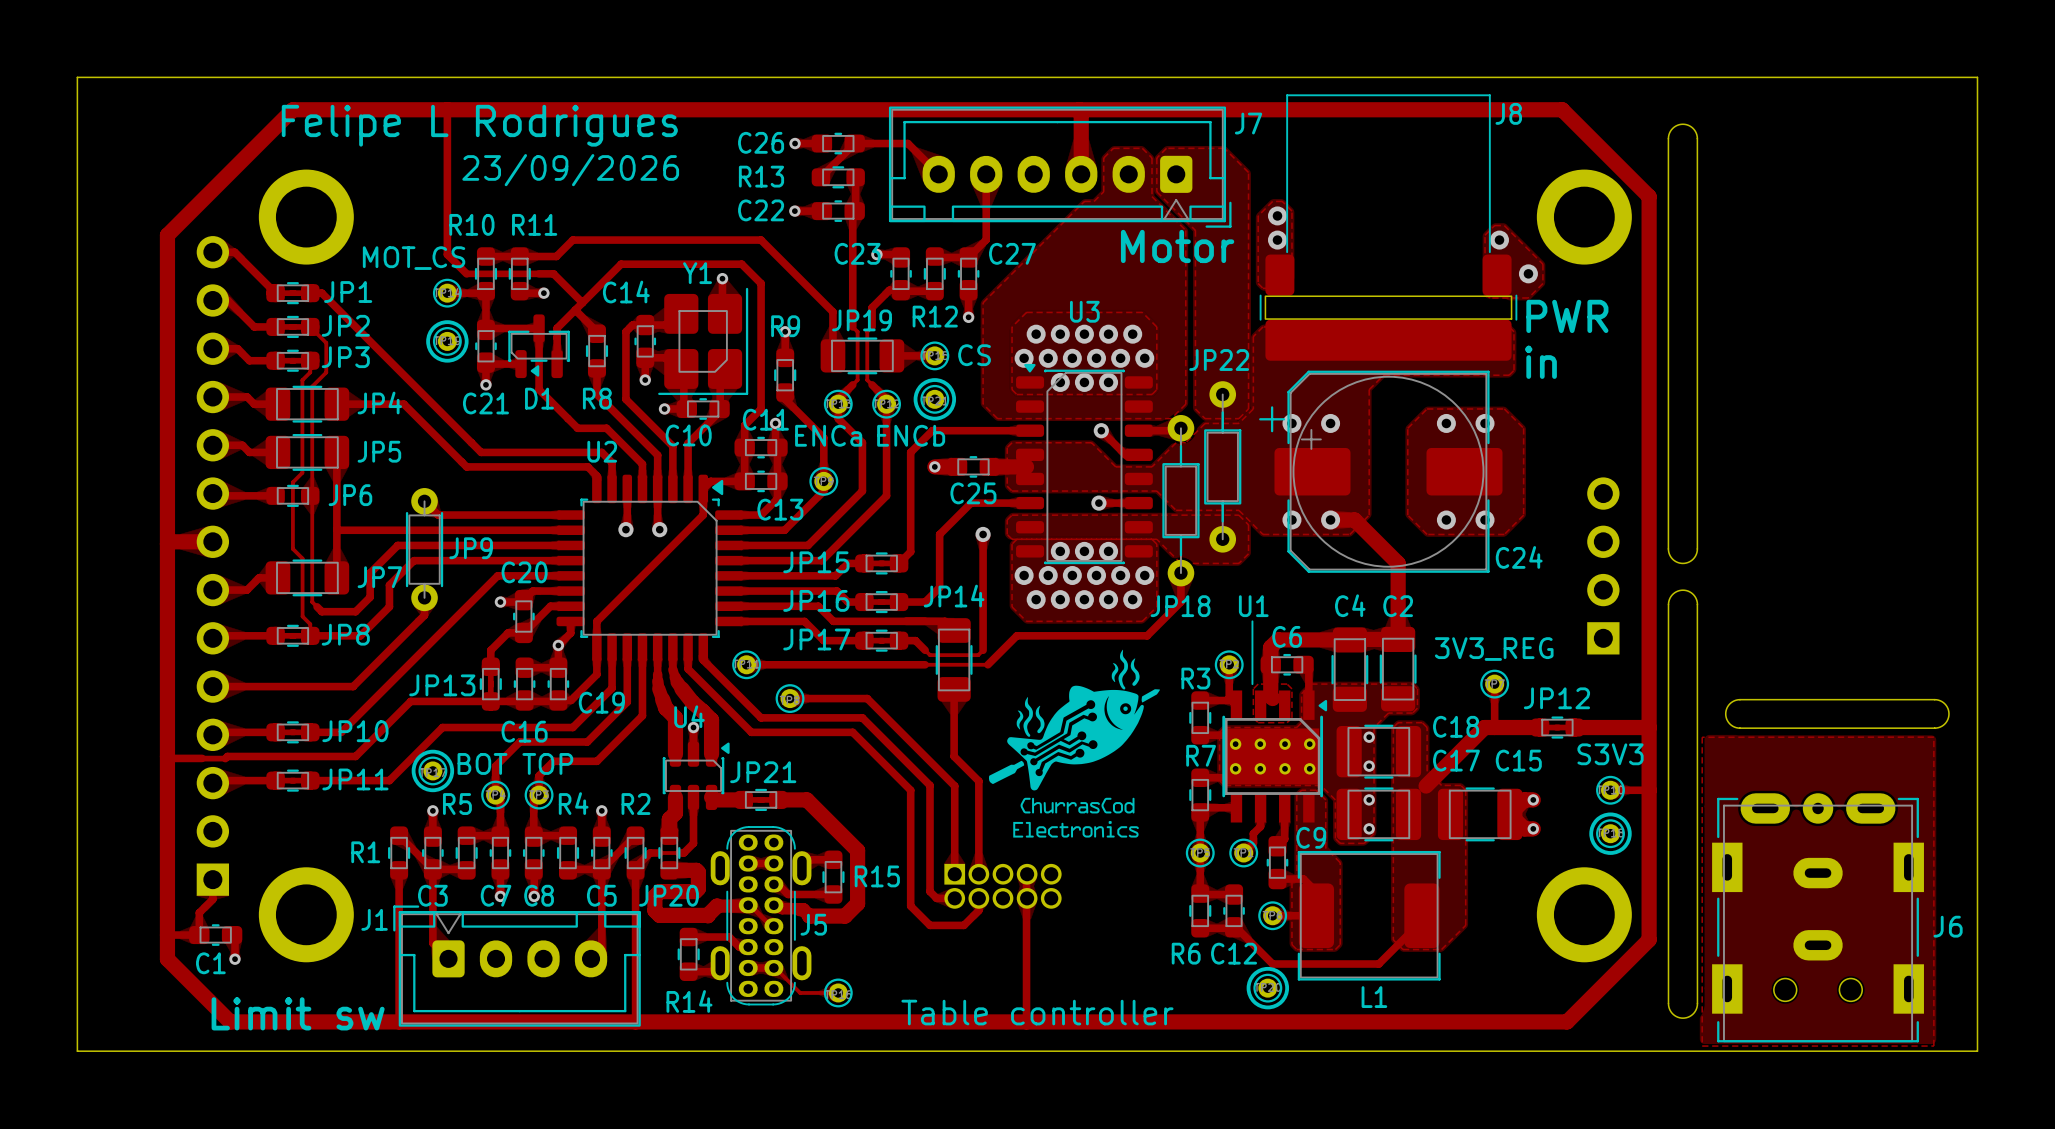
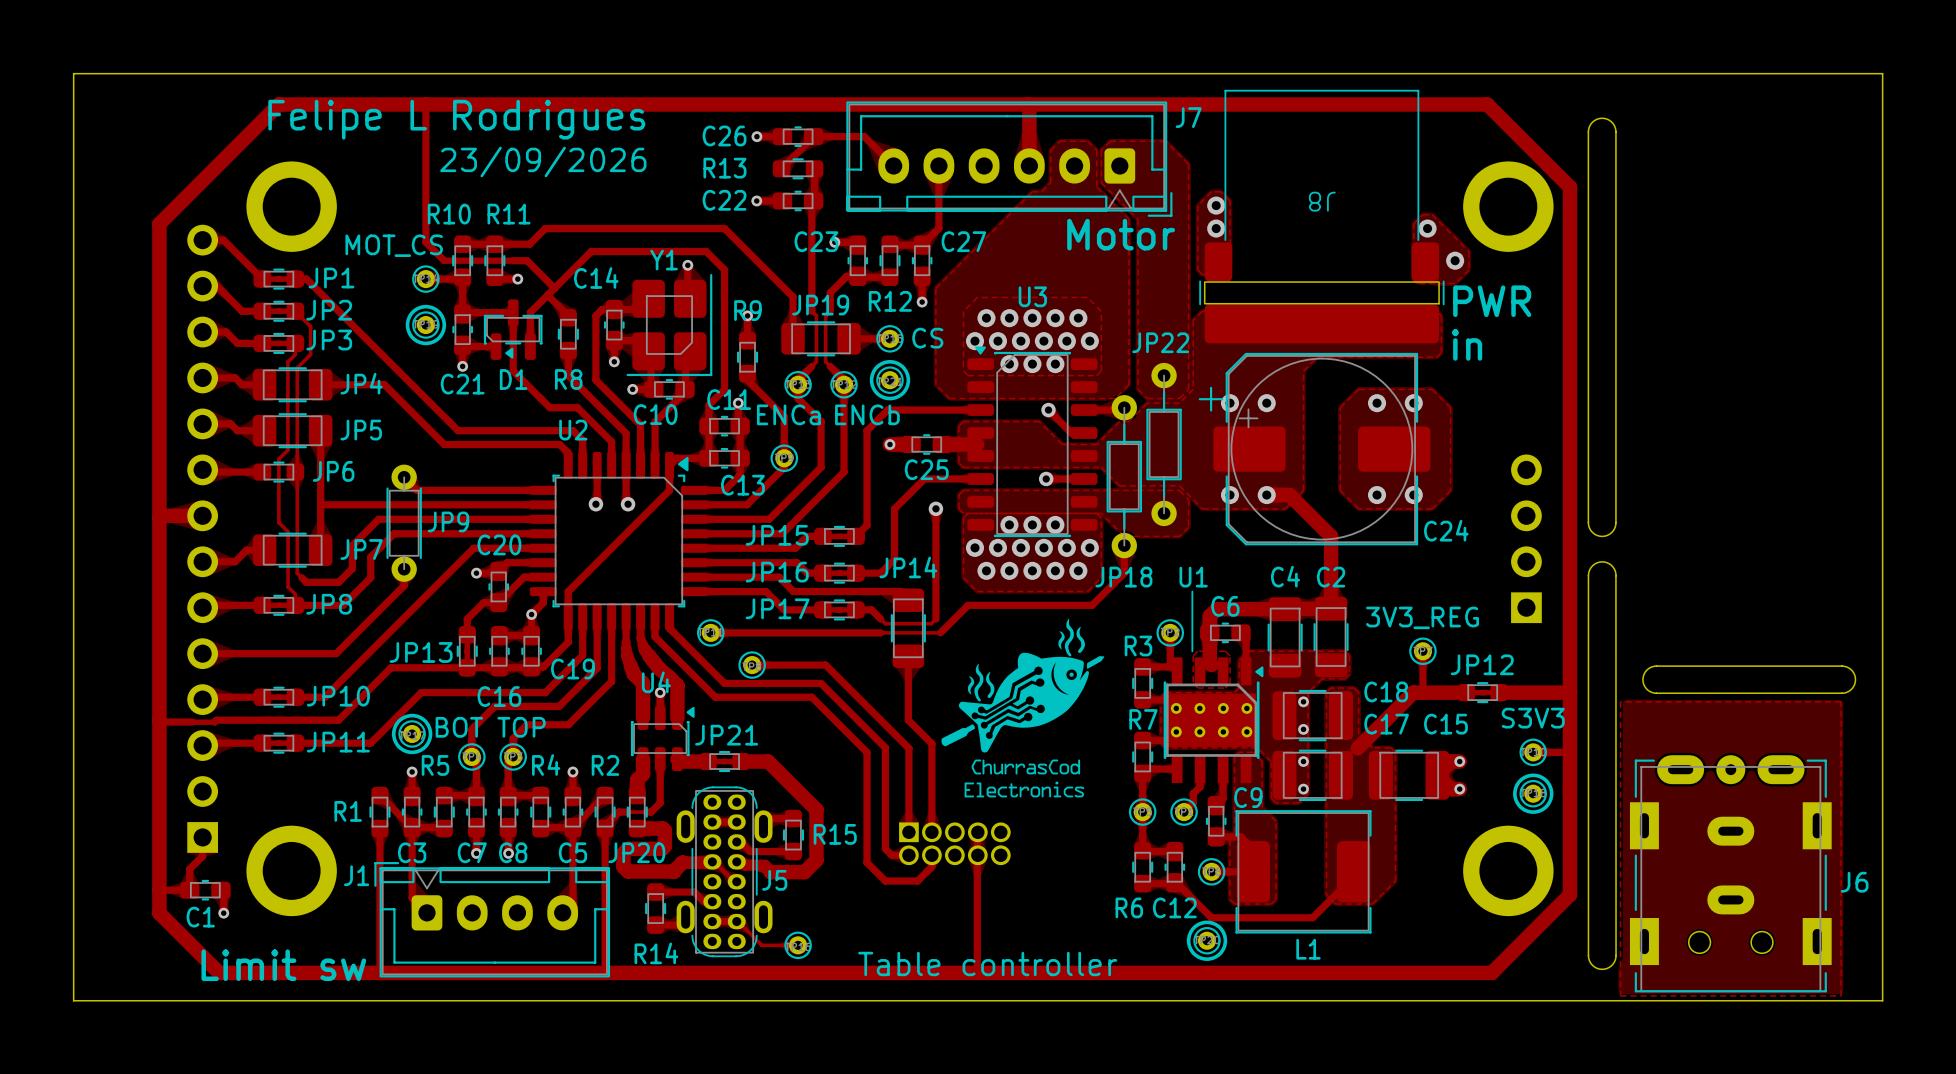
J8 name rotation: 0° (1508, 113) -> 180° (1322, 201)
J8 name position: J8 (1508, 113) -> J8 (1322, 201)

